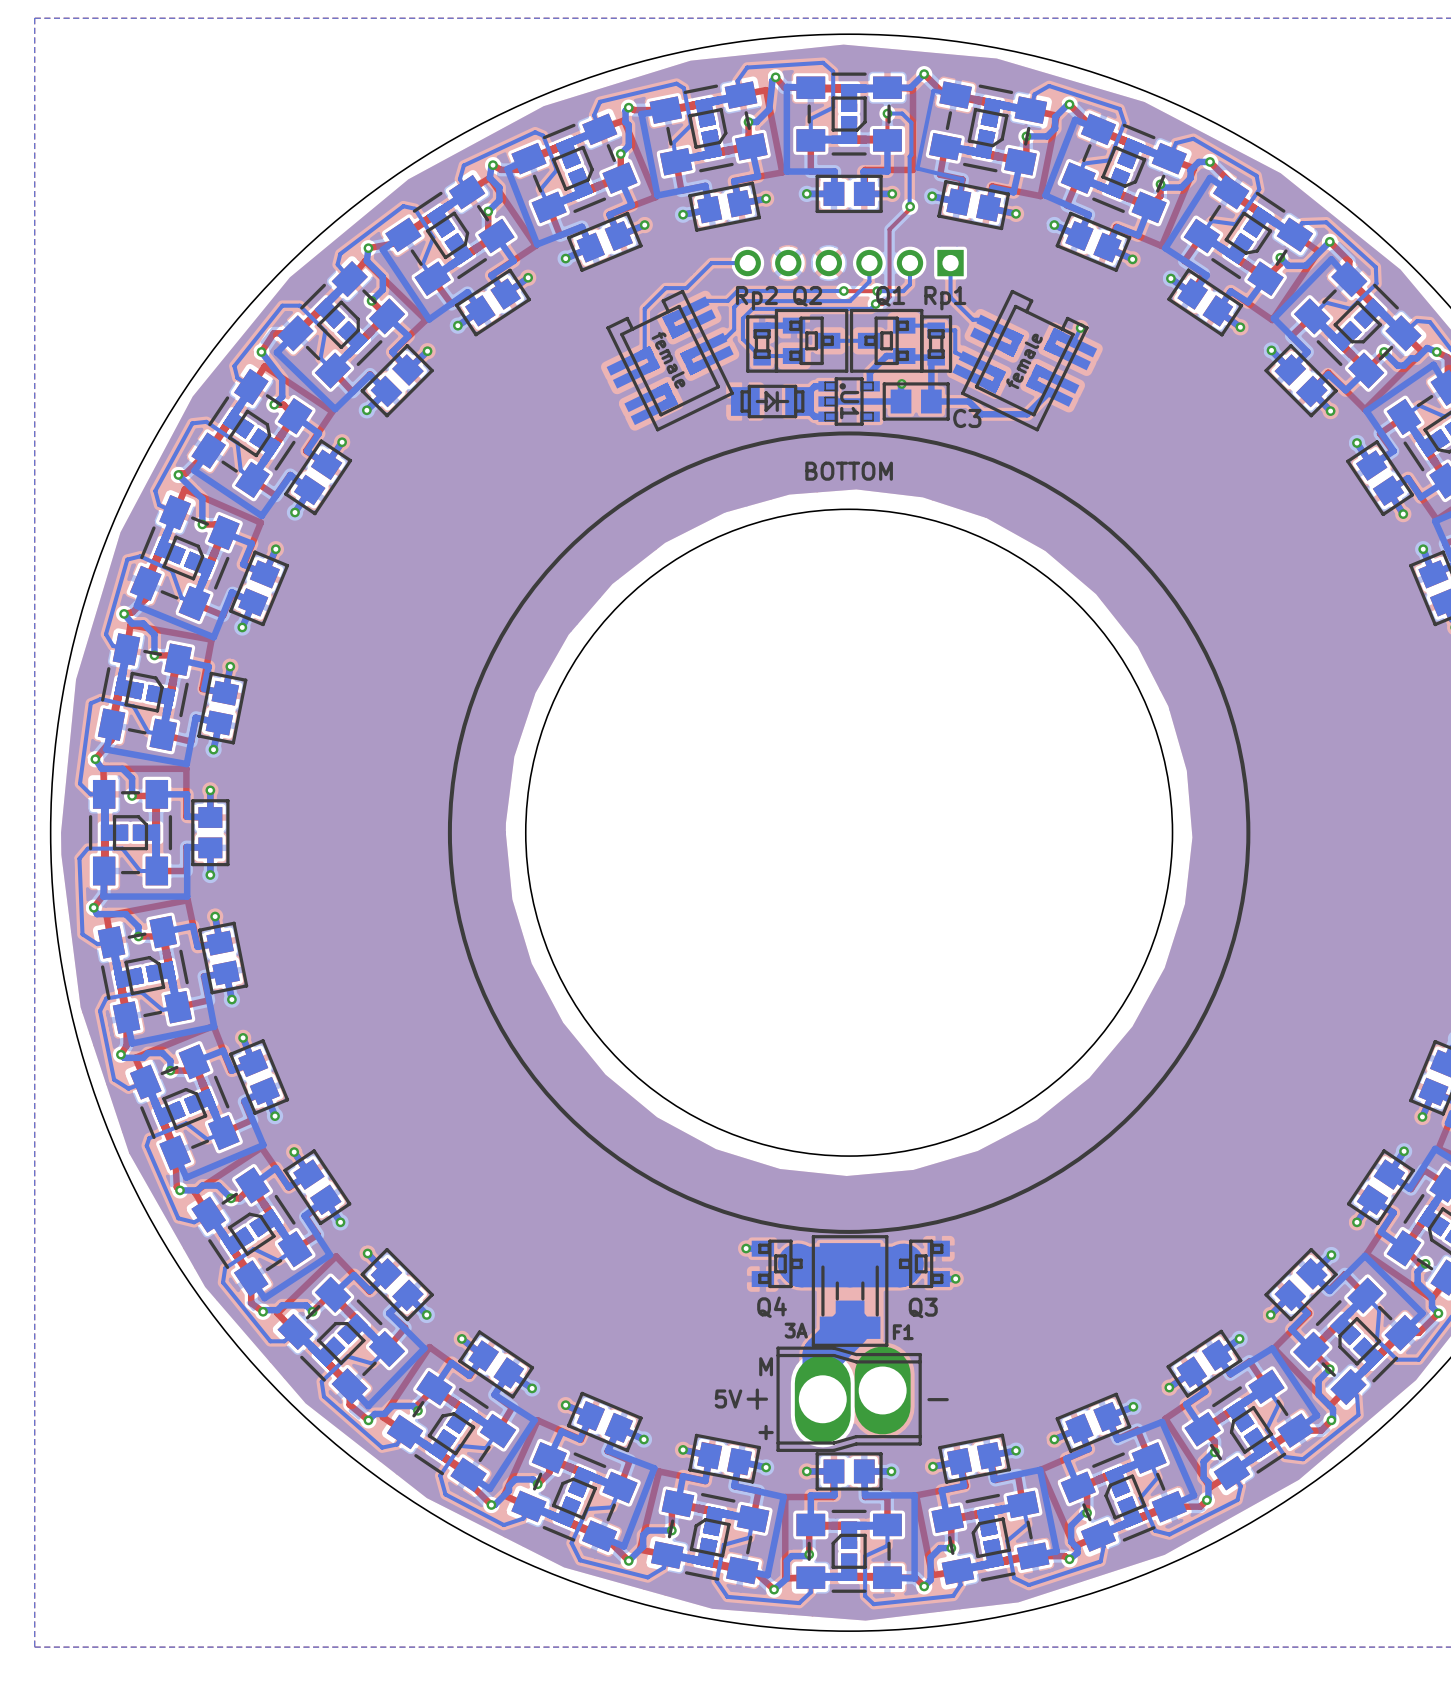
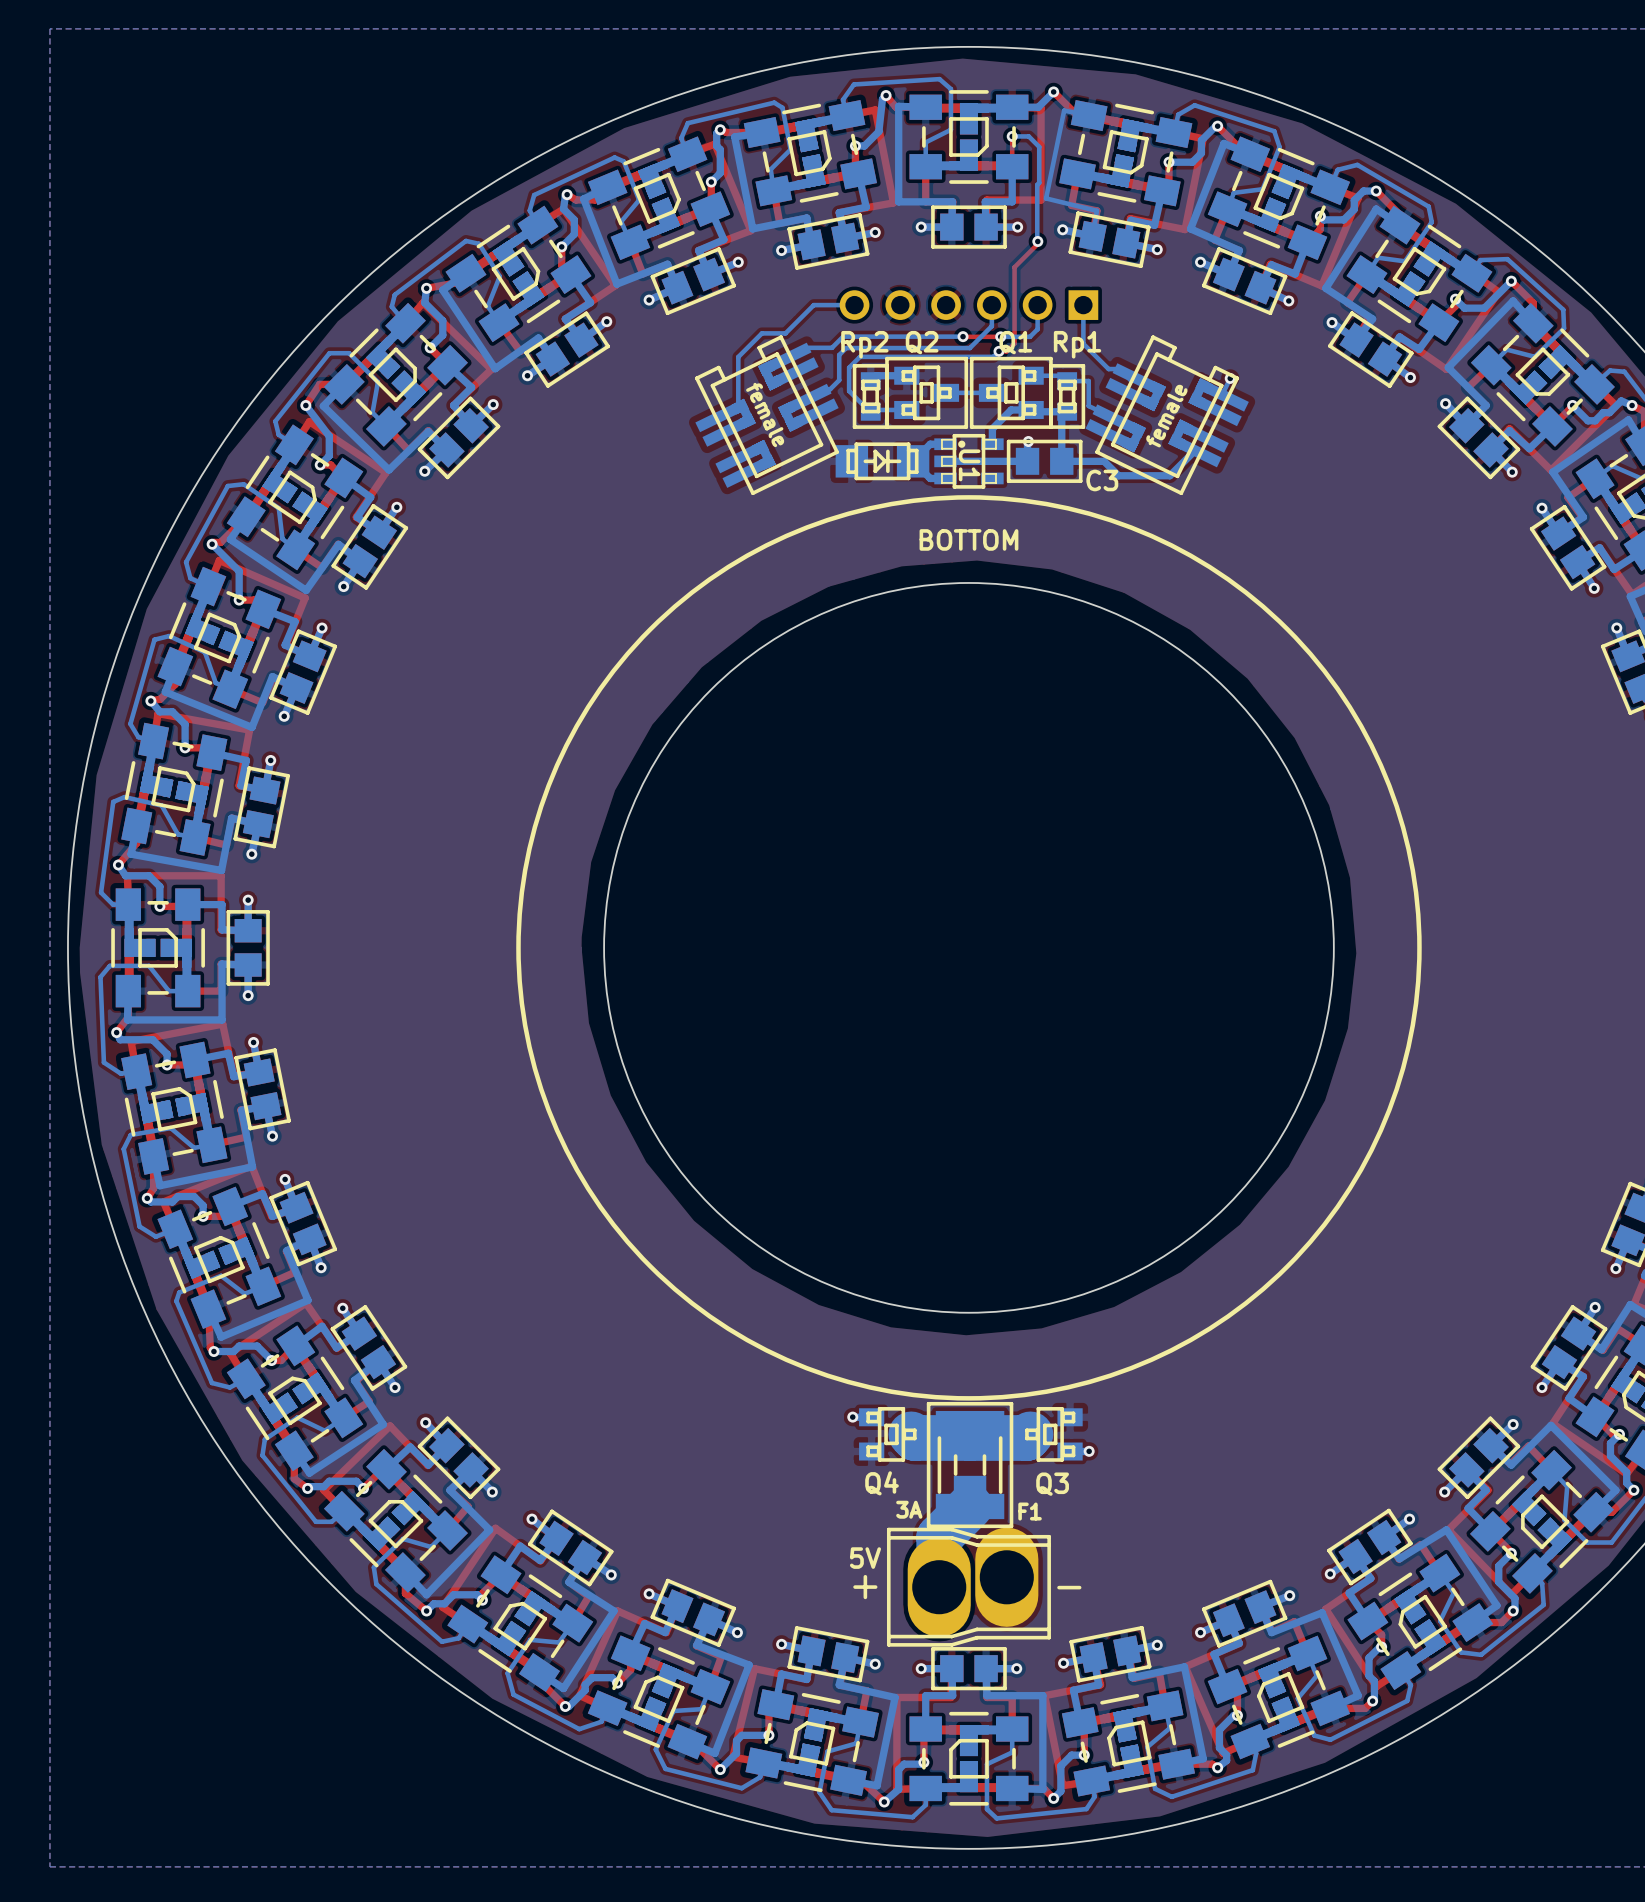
part text: M (766, 1366) -> none
text position: 5V (728, 1399) -> 5V (865, 1558)
part text: + (766, 1432) -> none

